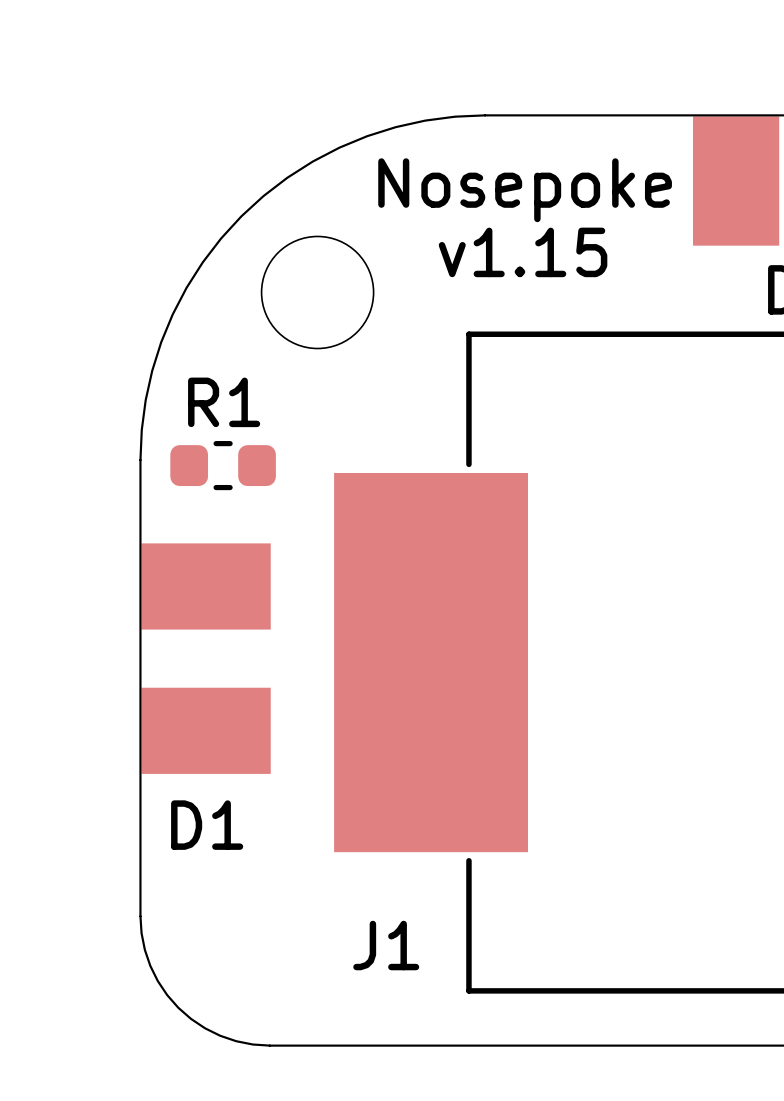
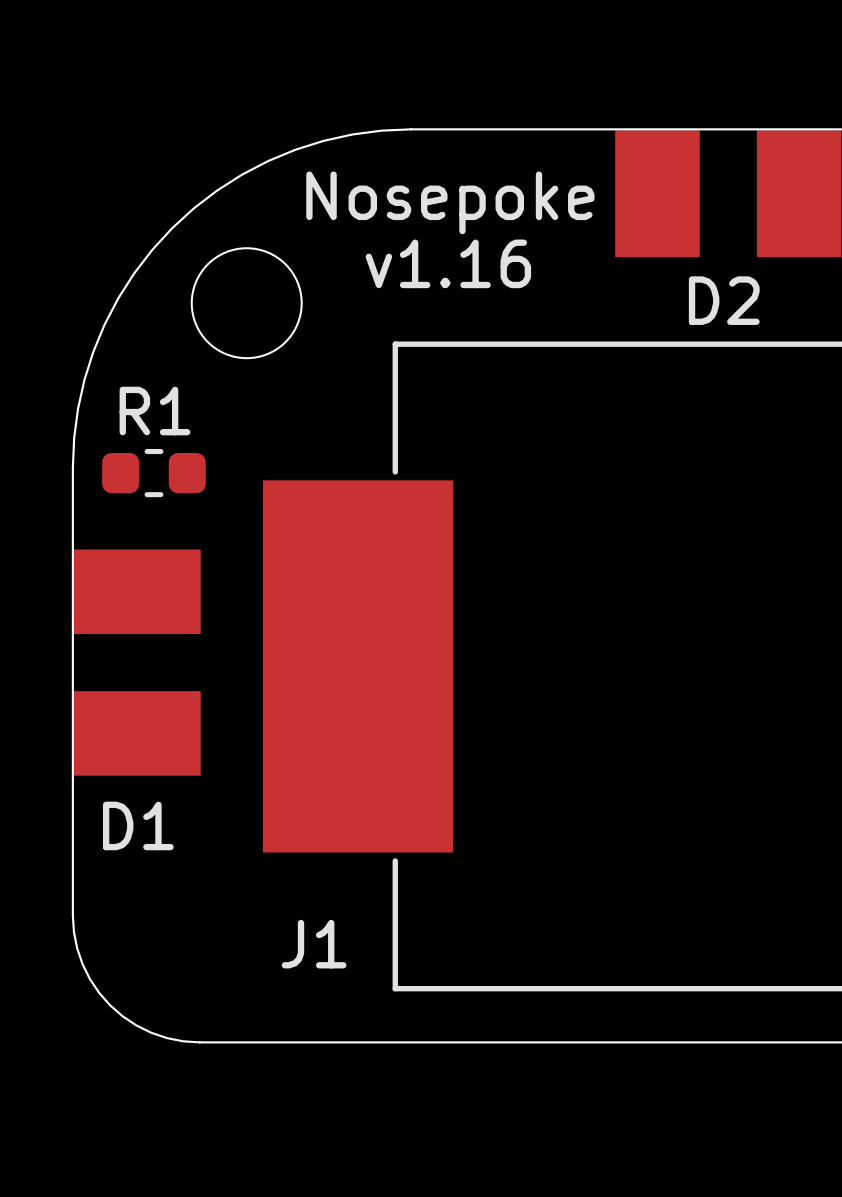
text: v1.15 (523, 252) -> v1.16 (448, 263)

